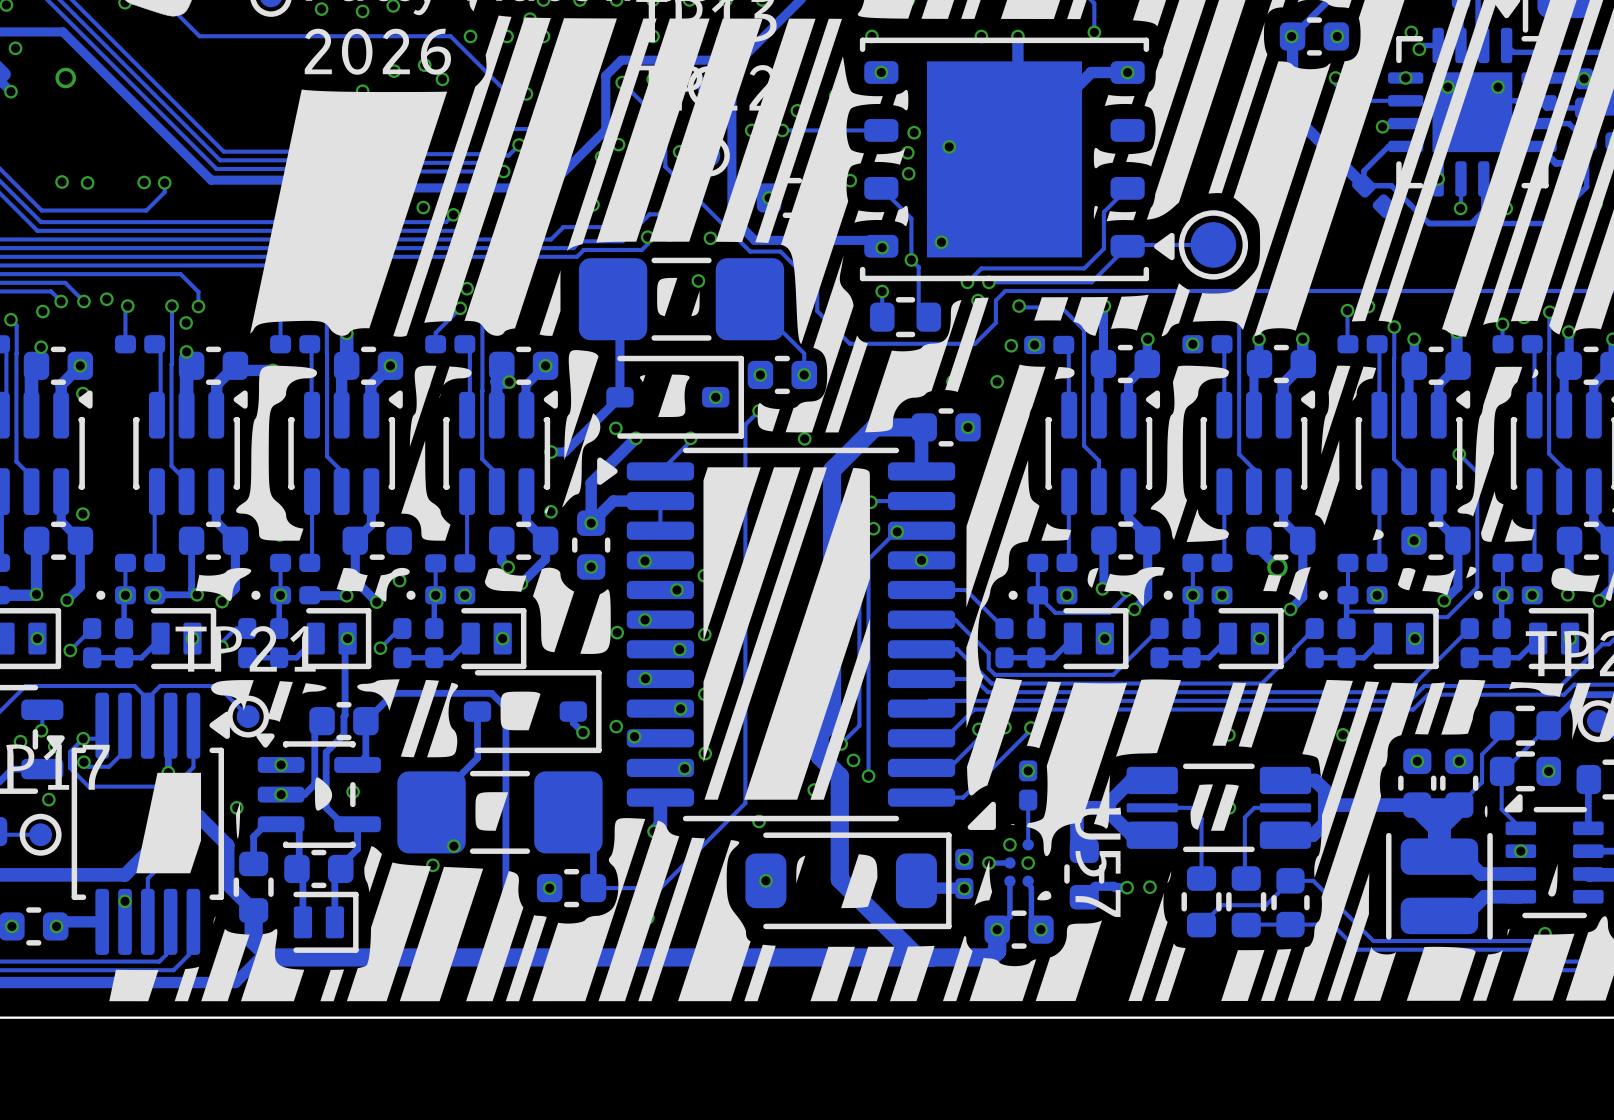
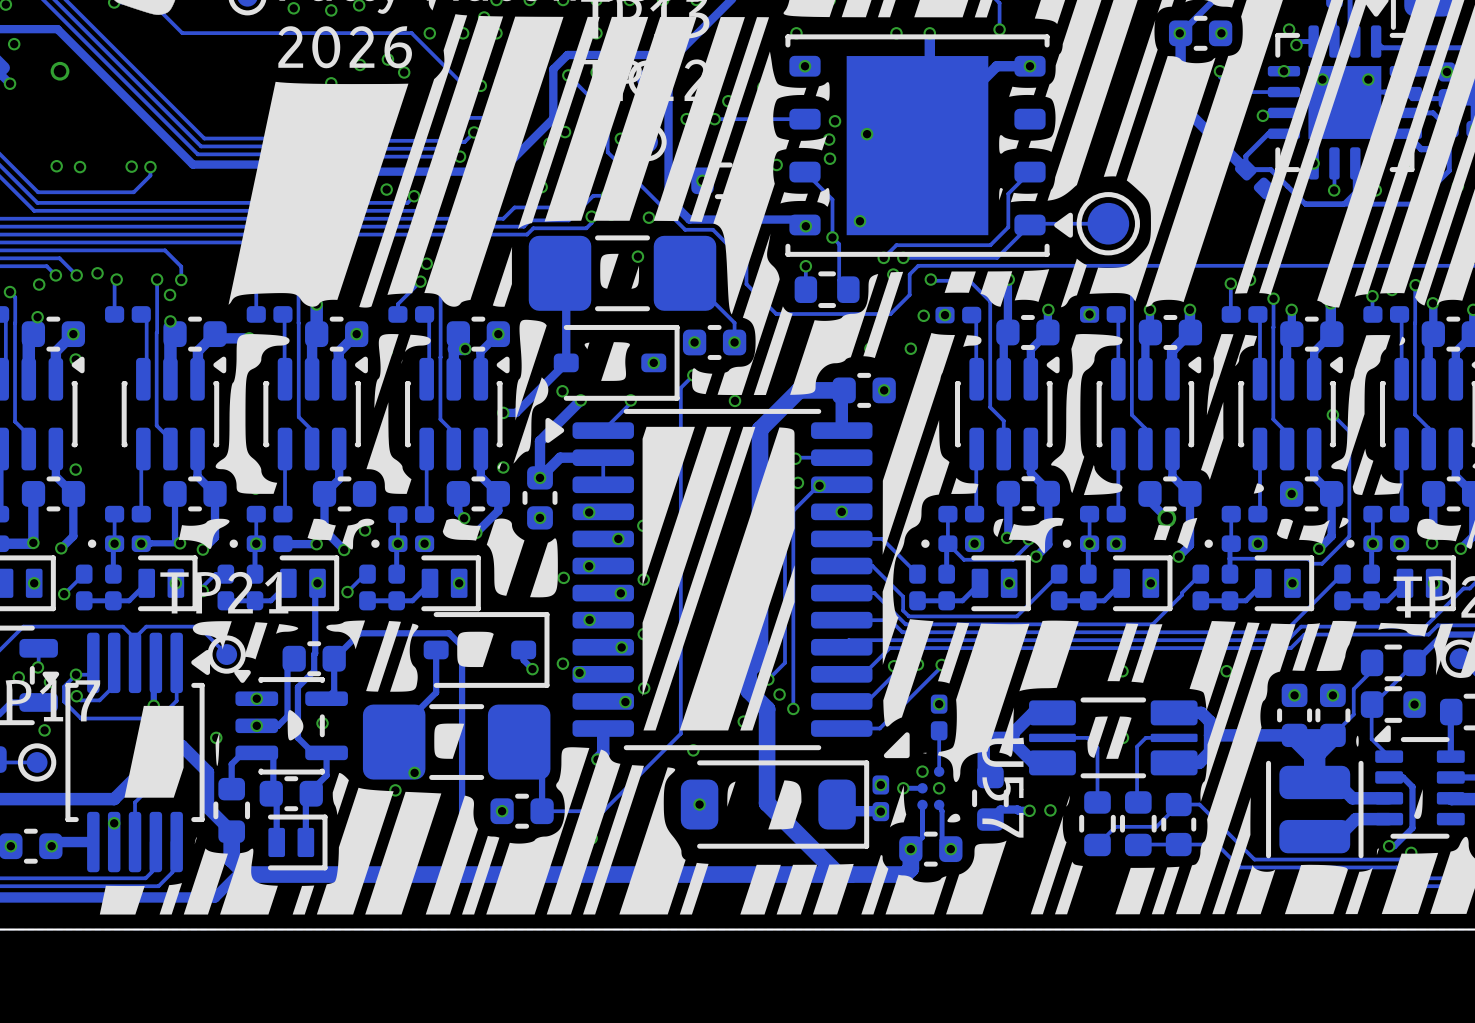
track: none -> (1389, 777) (1403, 777) (1412, 786) (1412, 828) (1394, 846) (1389, 846)
via position: (1520, 851) -> (1389, 846)

